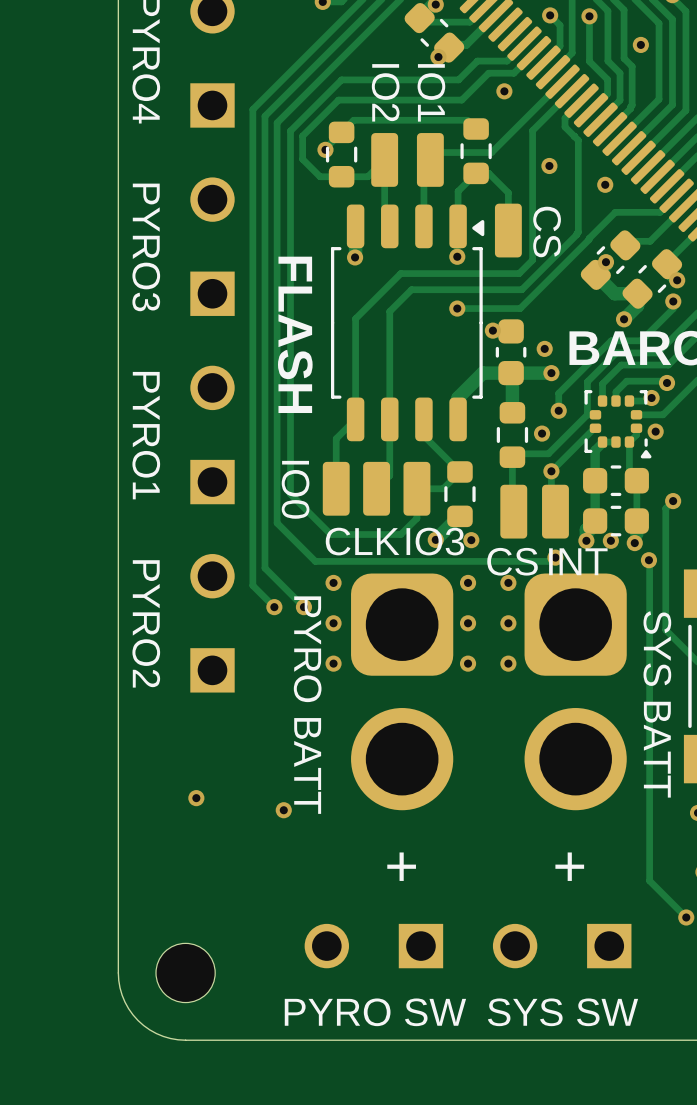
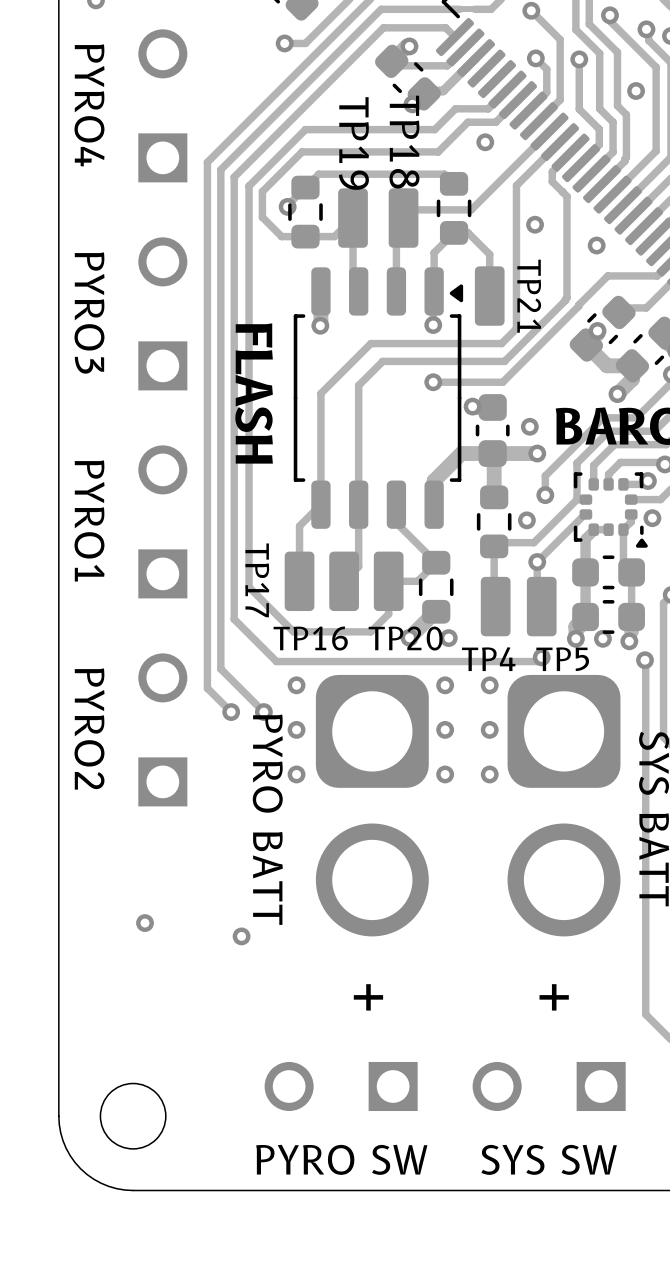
IO2 name: IO2 (385, 92) -> TP19 (353, 143)
IO1 name: IO1 (431, 92) -> TP18 (404, 142)
CS name: CS (547, 231) -> TP21 (529, 296)
IO0 name: IO0 (295, 489) -> TP17 (257, 580)
CLK name: CLK (362, 541) -> TP16 (310, 638)
IO3 name: IO3 (435, 541) -> TP20 (405, 638)
CS name: CS (512, 561) -> TP4 (488, 659)
INT name: INT (578, 561) -> TP5 (562, 659)

